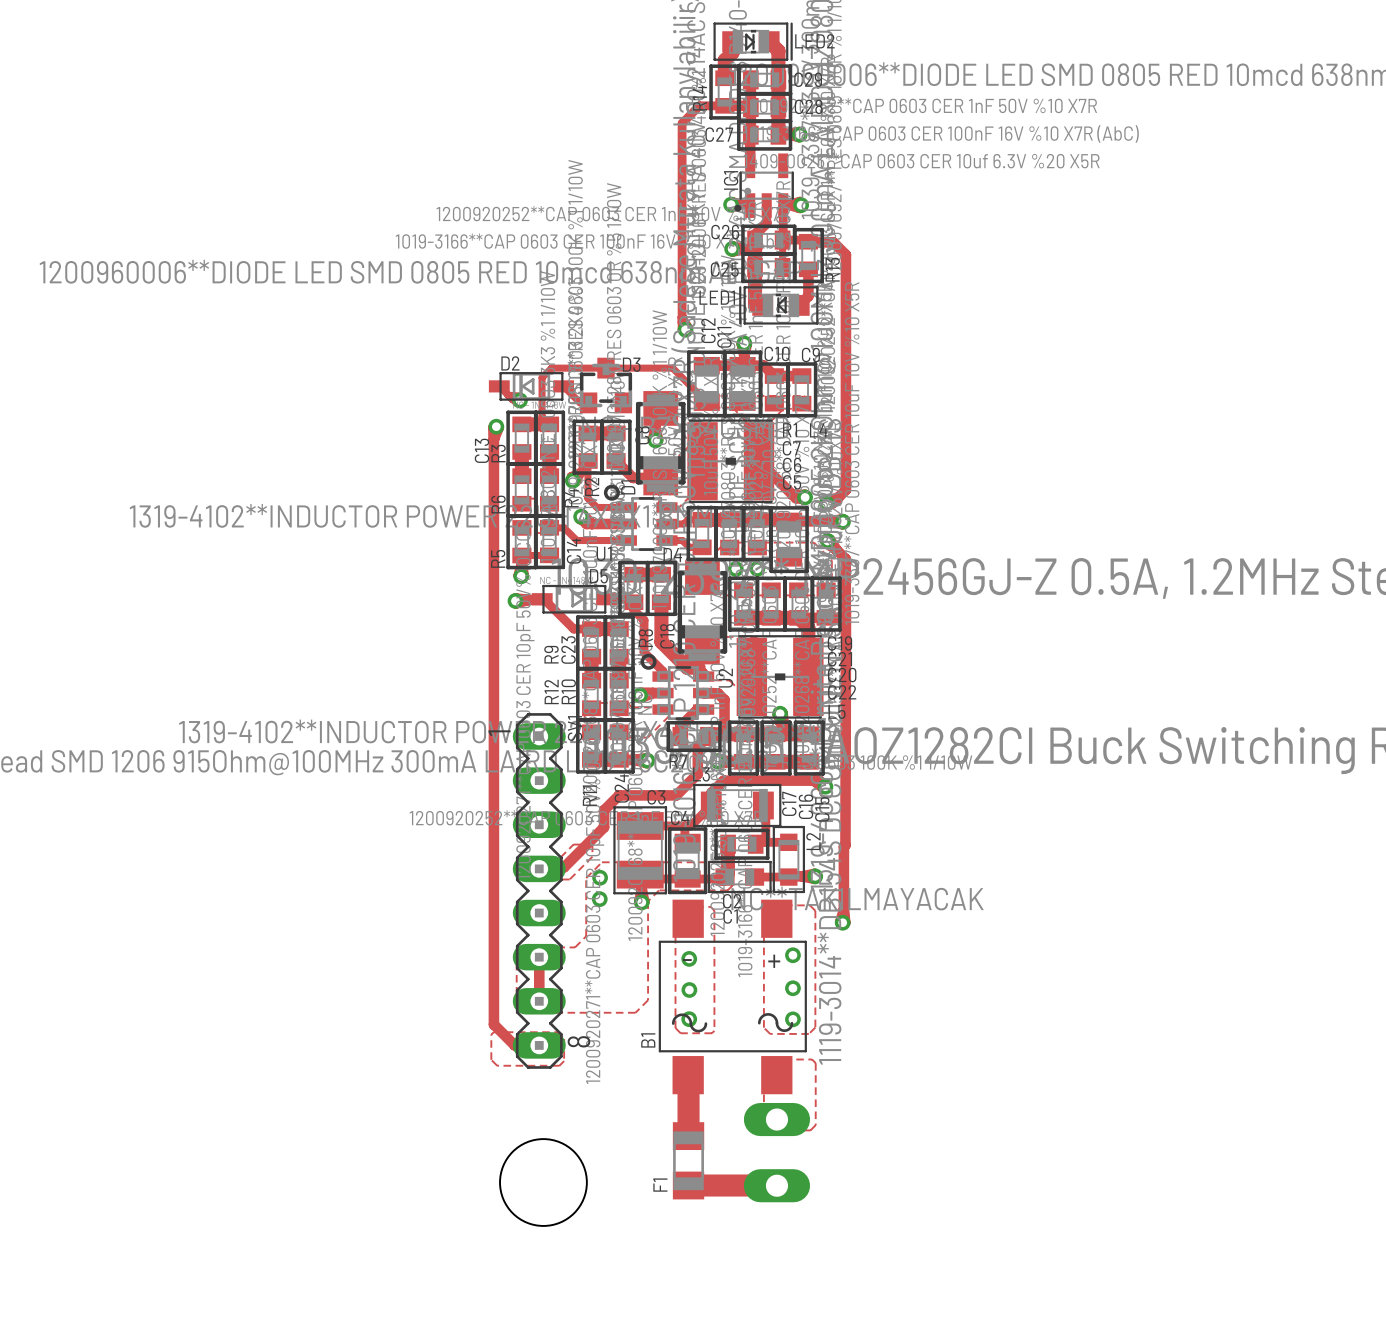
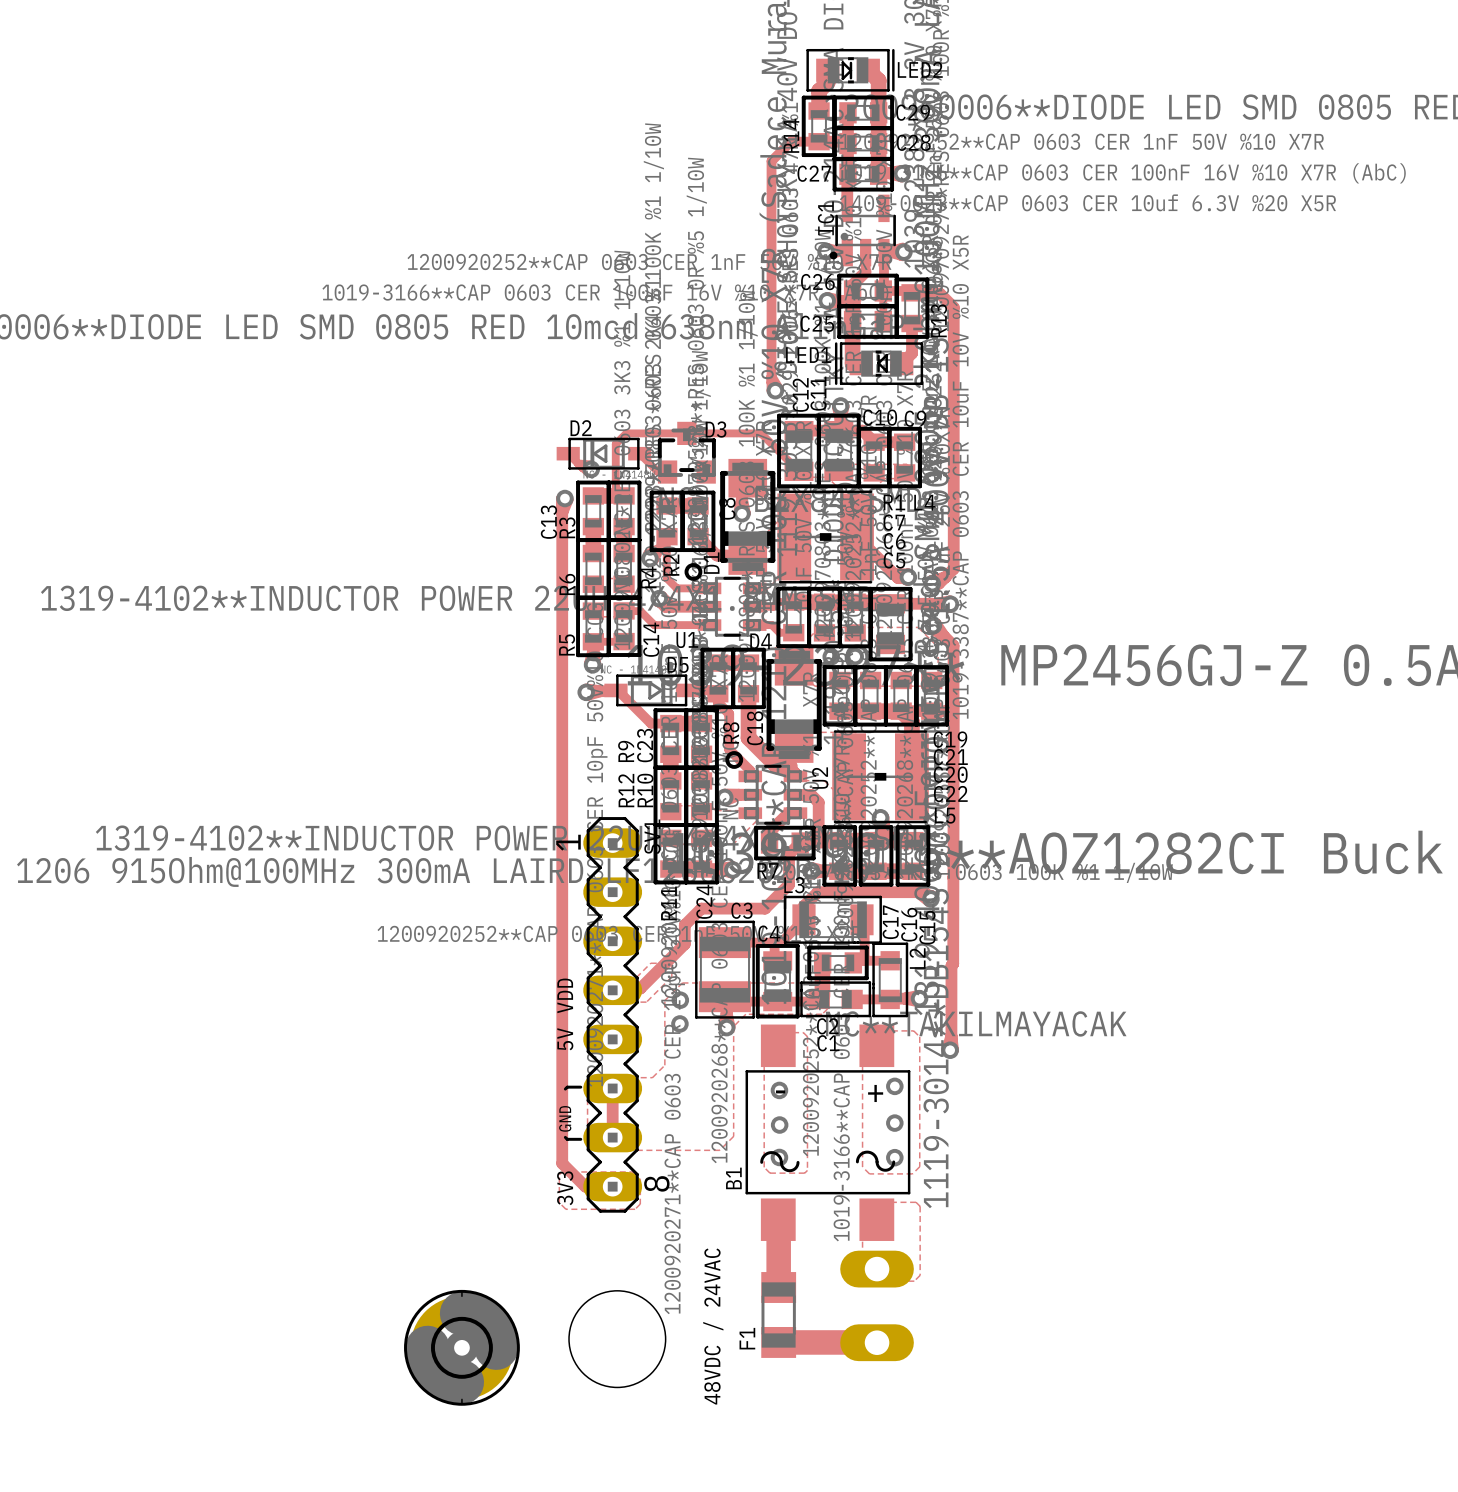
text: none -> VDD (565, 995)
text: none -> 5V (565, 1039)
line: none -> (580, 1087) (567, 1087) (565, 1089)
text: none -> GND (565, 1118)
line: none -> (565, 1137) (567, 1139) (580, 1139)
text: none -> 3V3 (565, 1188)
text: none -> 48VDC / 24VAC (713, 1326)
part: none -> (461, 1347)

